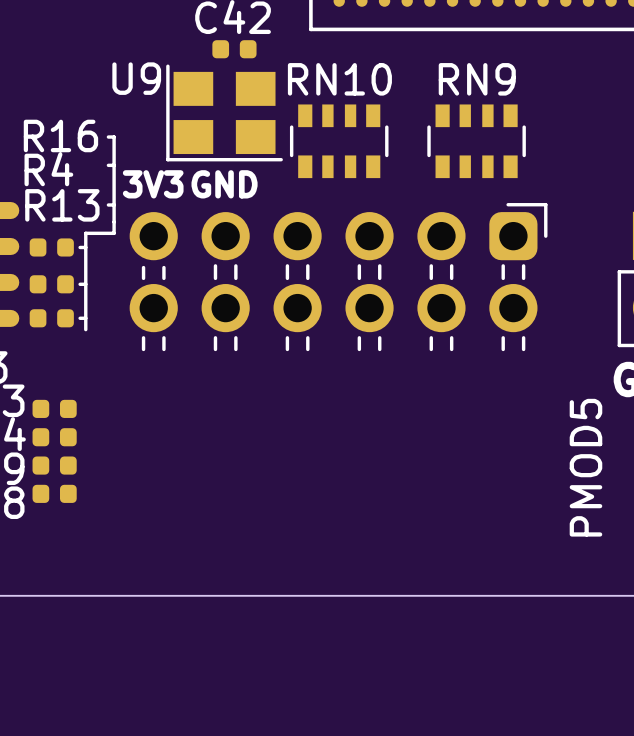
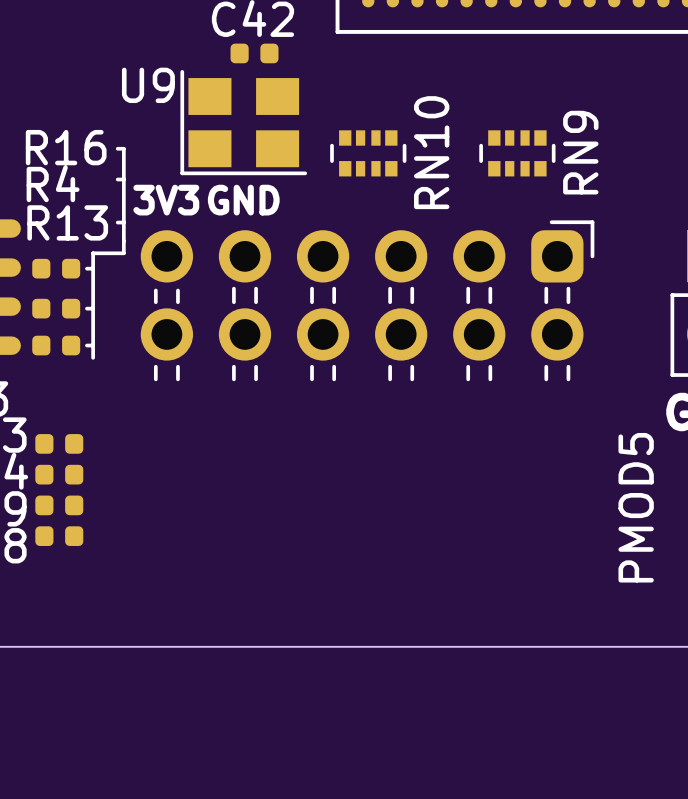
RN10 name rotation: 0° (339, 79) -> 90° counterclockwise (431, 152)
RN9 name rotation: 0° (477, 79) -> 90° counterclockwise (580, 152)
RN10 footprint: [289, 104, 389, 179] -> [330, 130, 407, 177]
RN9 footprint: [427, 104, 526, 179] -> [479, 130, 556, 177]

